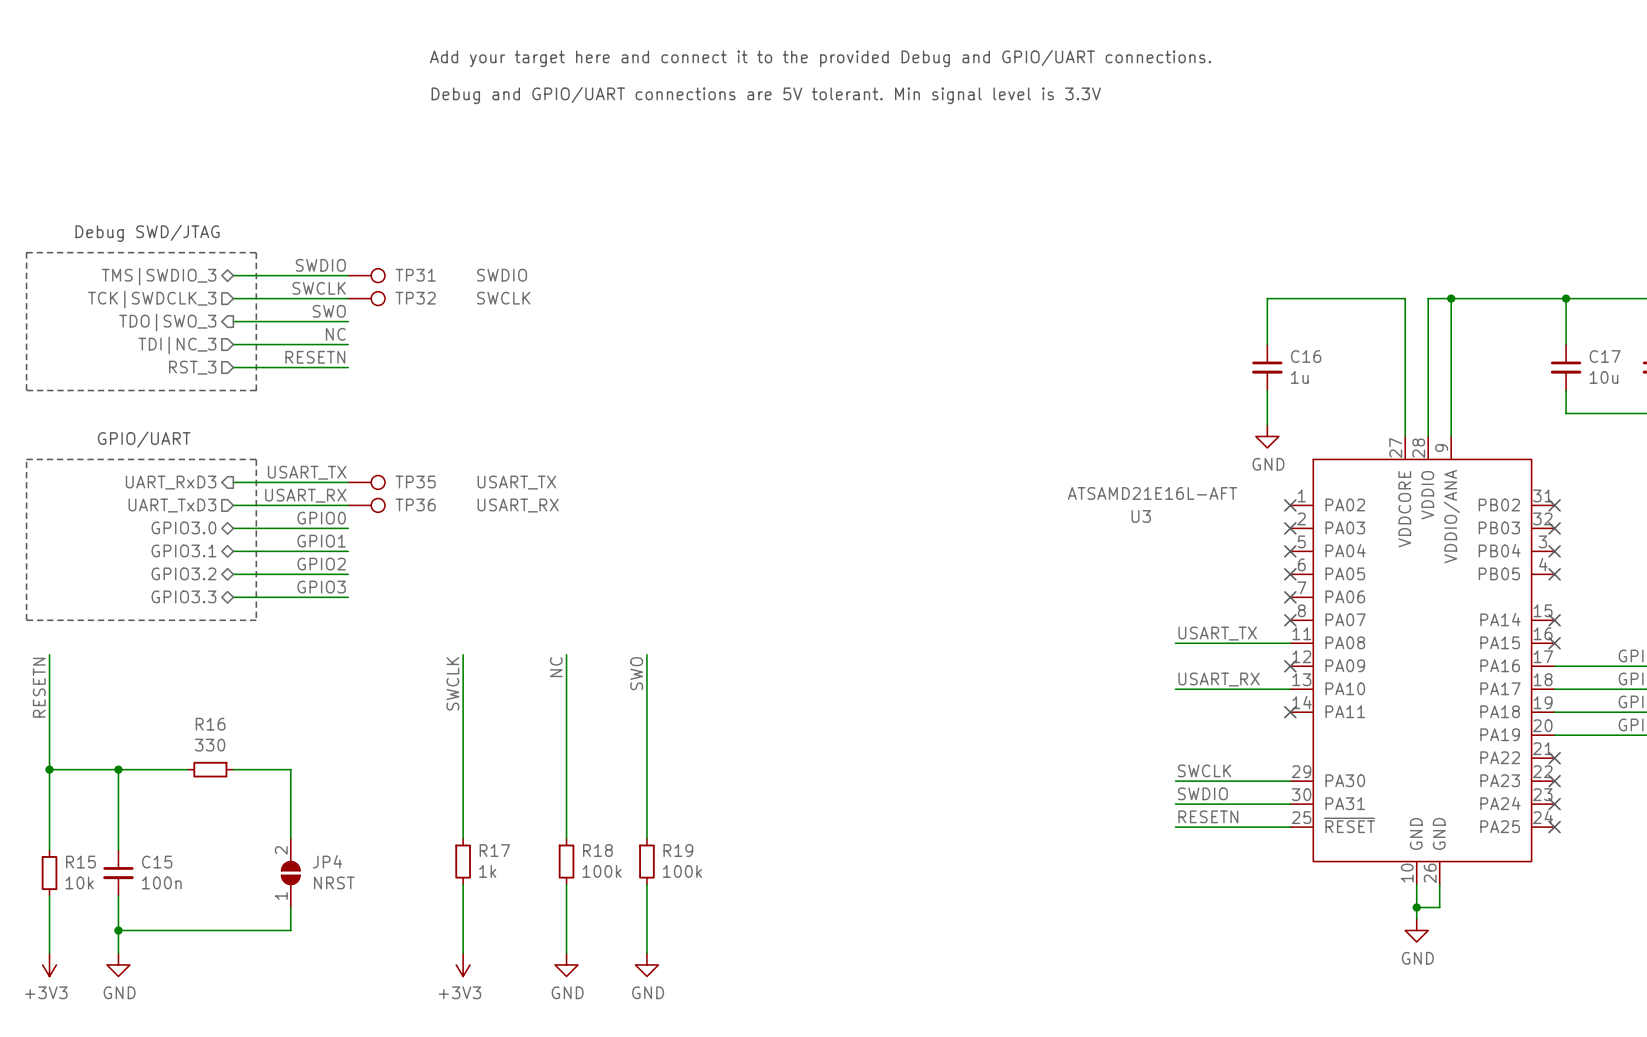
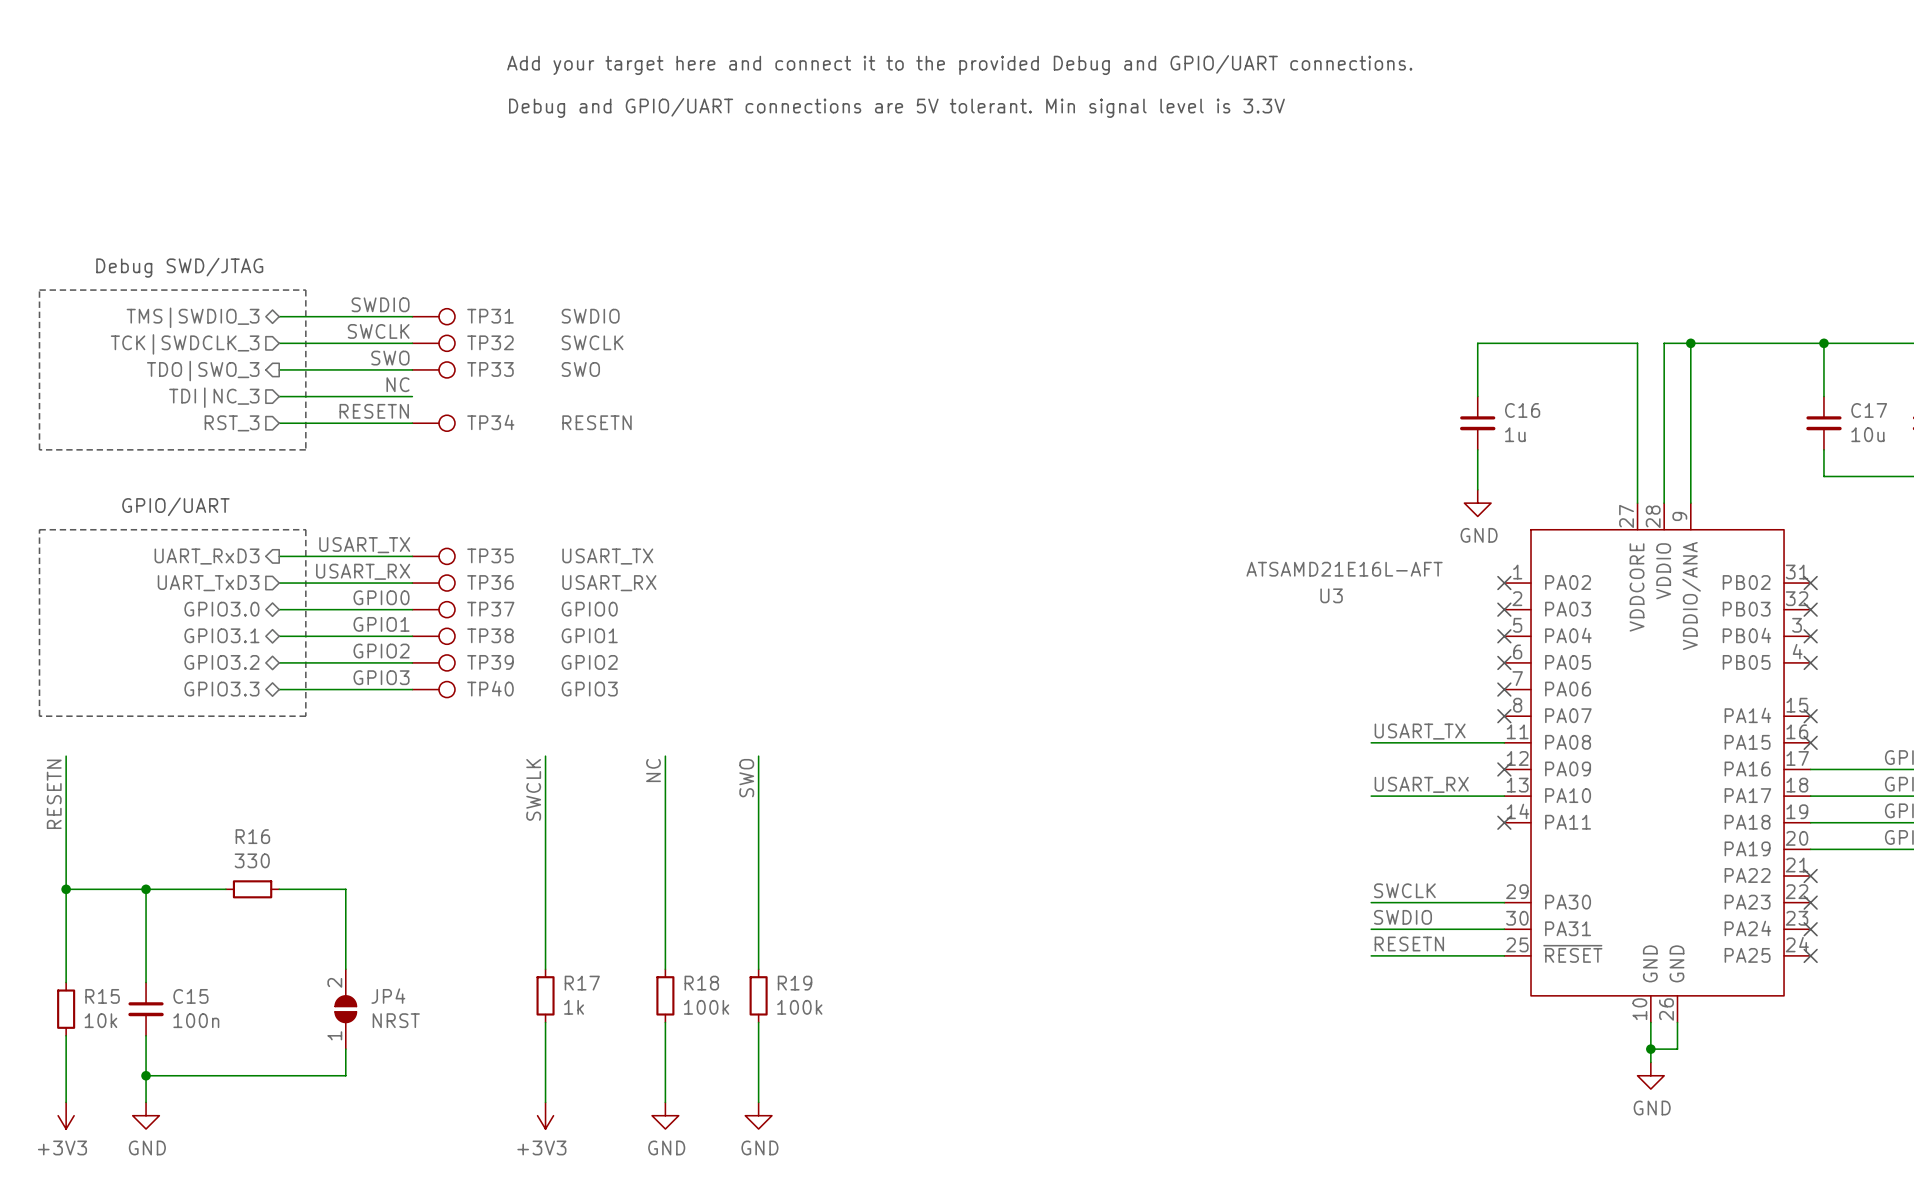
TP33: none -> SWO (433, 369)
TP34: none -> RESETN (433, 423)
TP37: none -> GPIO0 (433, 609)
TP38: none -> GPIO1 (433, 636)
TP39: none -> GPIO2 (433, 662)
TP40: none -> GPIO3 (433, 689)

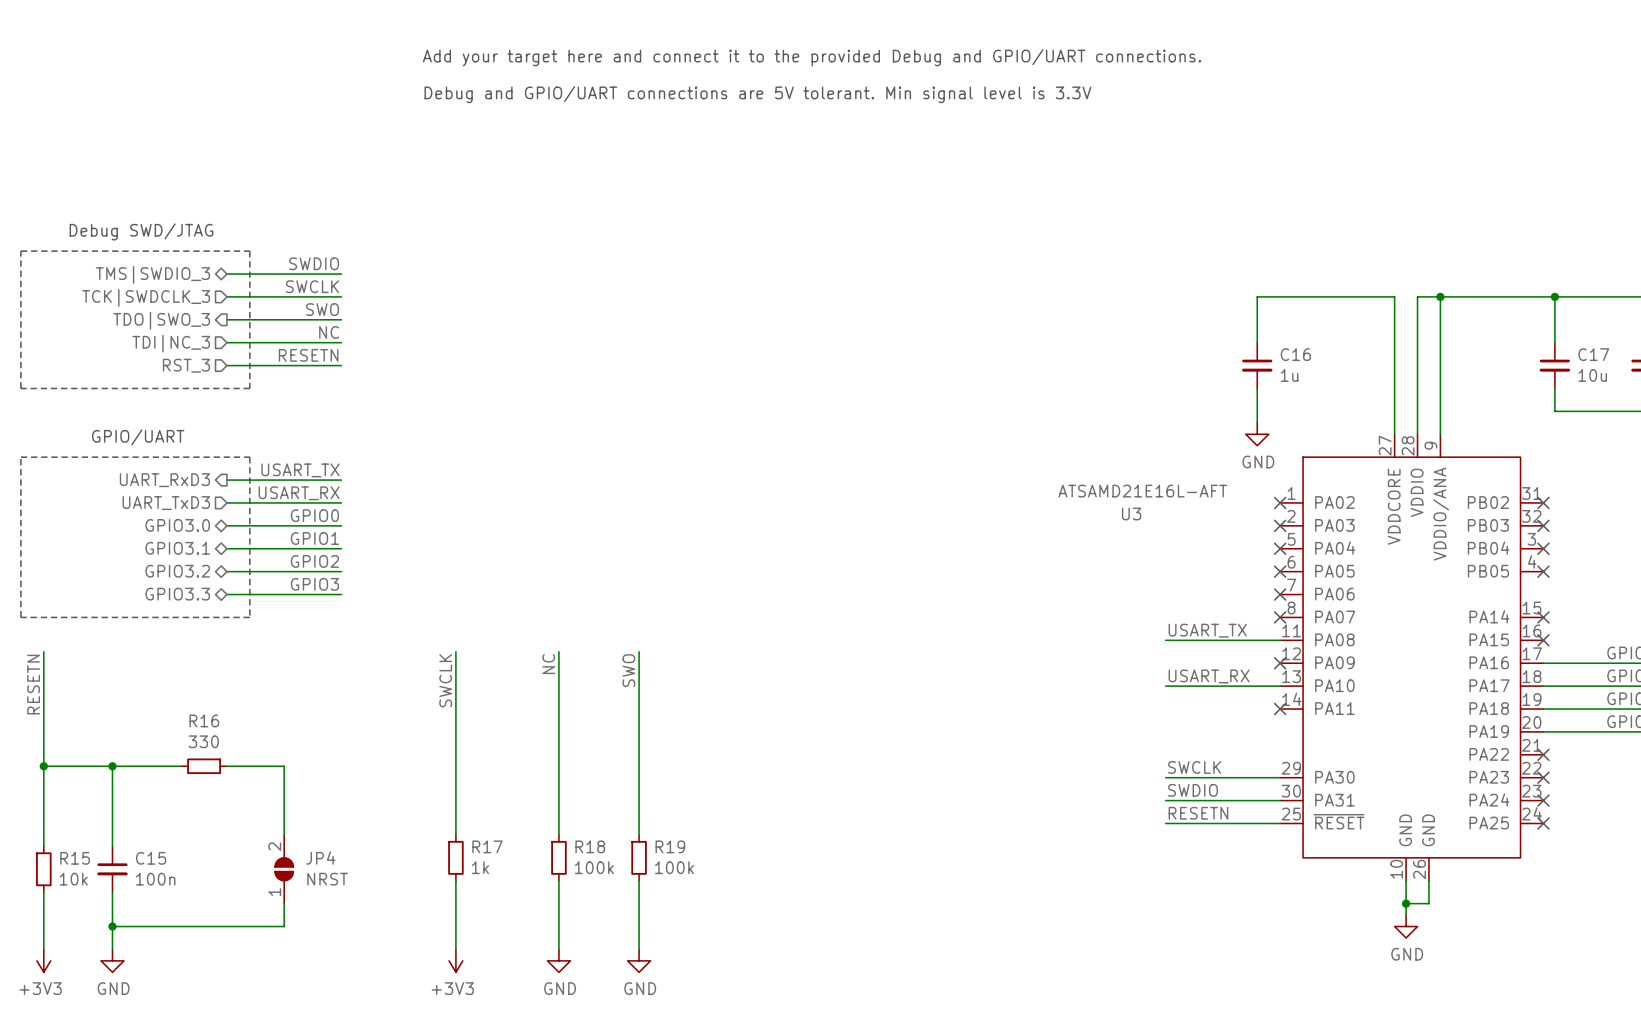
TP31: SWDIO (433, 316) -> none
TP32: SWCLK (433, 343) -> none
TP33: SWO (433, 369) -> none
TP34: RESETN (433, 423) -> none
TP35: USART_TX (433, 556) -> none
TP36: USART_RX (433, 583) -> none
TP37: GPIO0 (433, 609) -> none
TP38: GPIO1 (433, 636) -> none
TP39: GPIO2 (433, 662) -> none
TP40: GPIO3 (433, 689) -> none

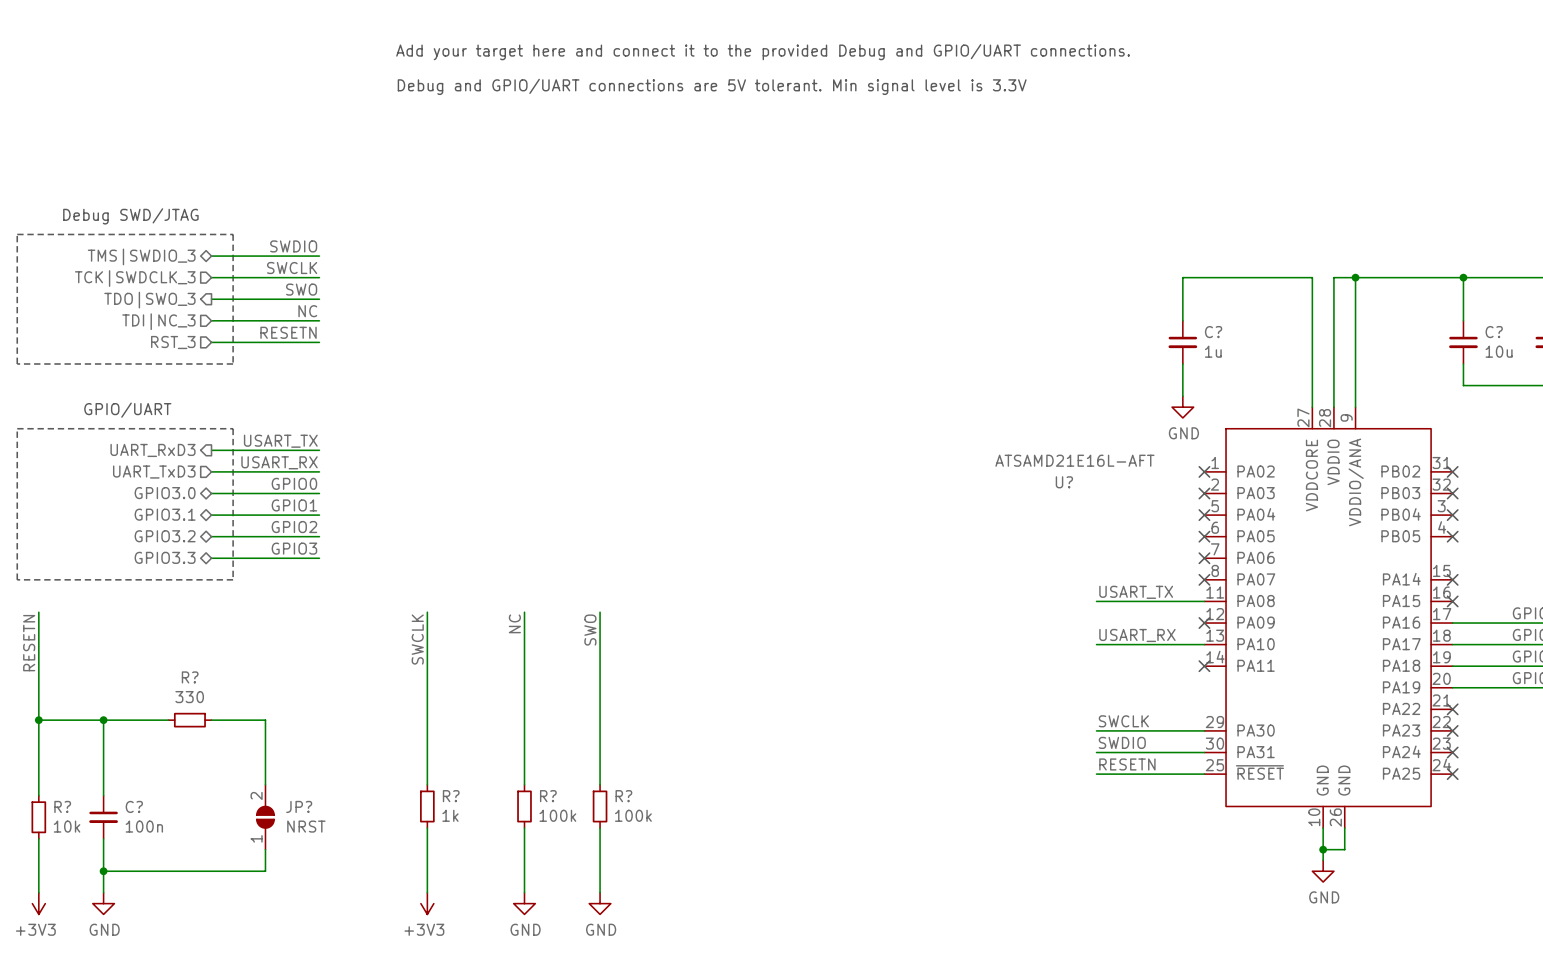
C16 name: C16 (1295, 354) -> C? (1213, 332)
C17 name: C17 (1593, 354) -> C? (1494, 332)
U3 name: U3 (1131, 513) -> U? (1064, 482)
R16 name: R16 (204, 720) -> R? (190, 677)
R17 name: R17 (487, 846) -> R? (451, 796)
R18 name: R18 (590, 846) -> R? (548, 796)
R19 name: R19 (670, 846) -> R? (623, 796)
R15 name: R15 (75, 858) -> R? (62, 806)
C15 name: C15 (151, 858) -> C? (134, 806)
JP4 name: JP4 (320, 858) -> JP? (299, 806)

